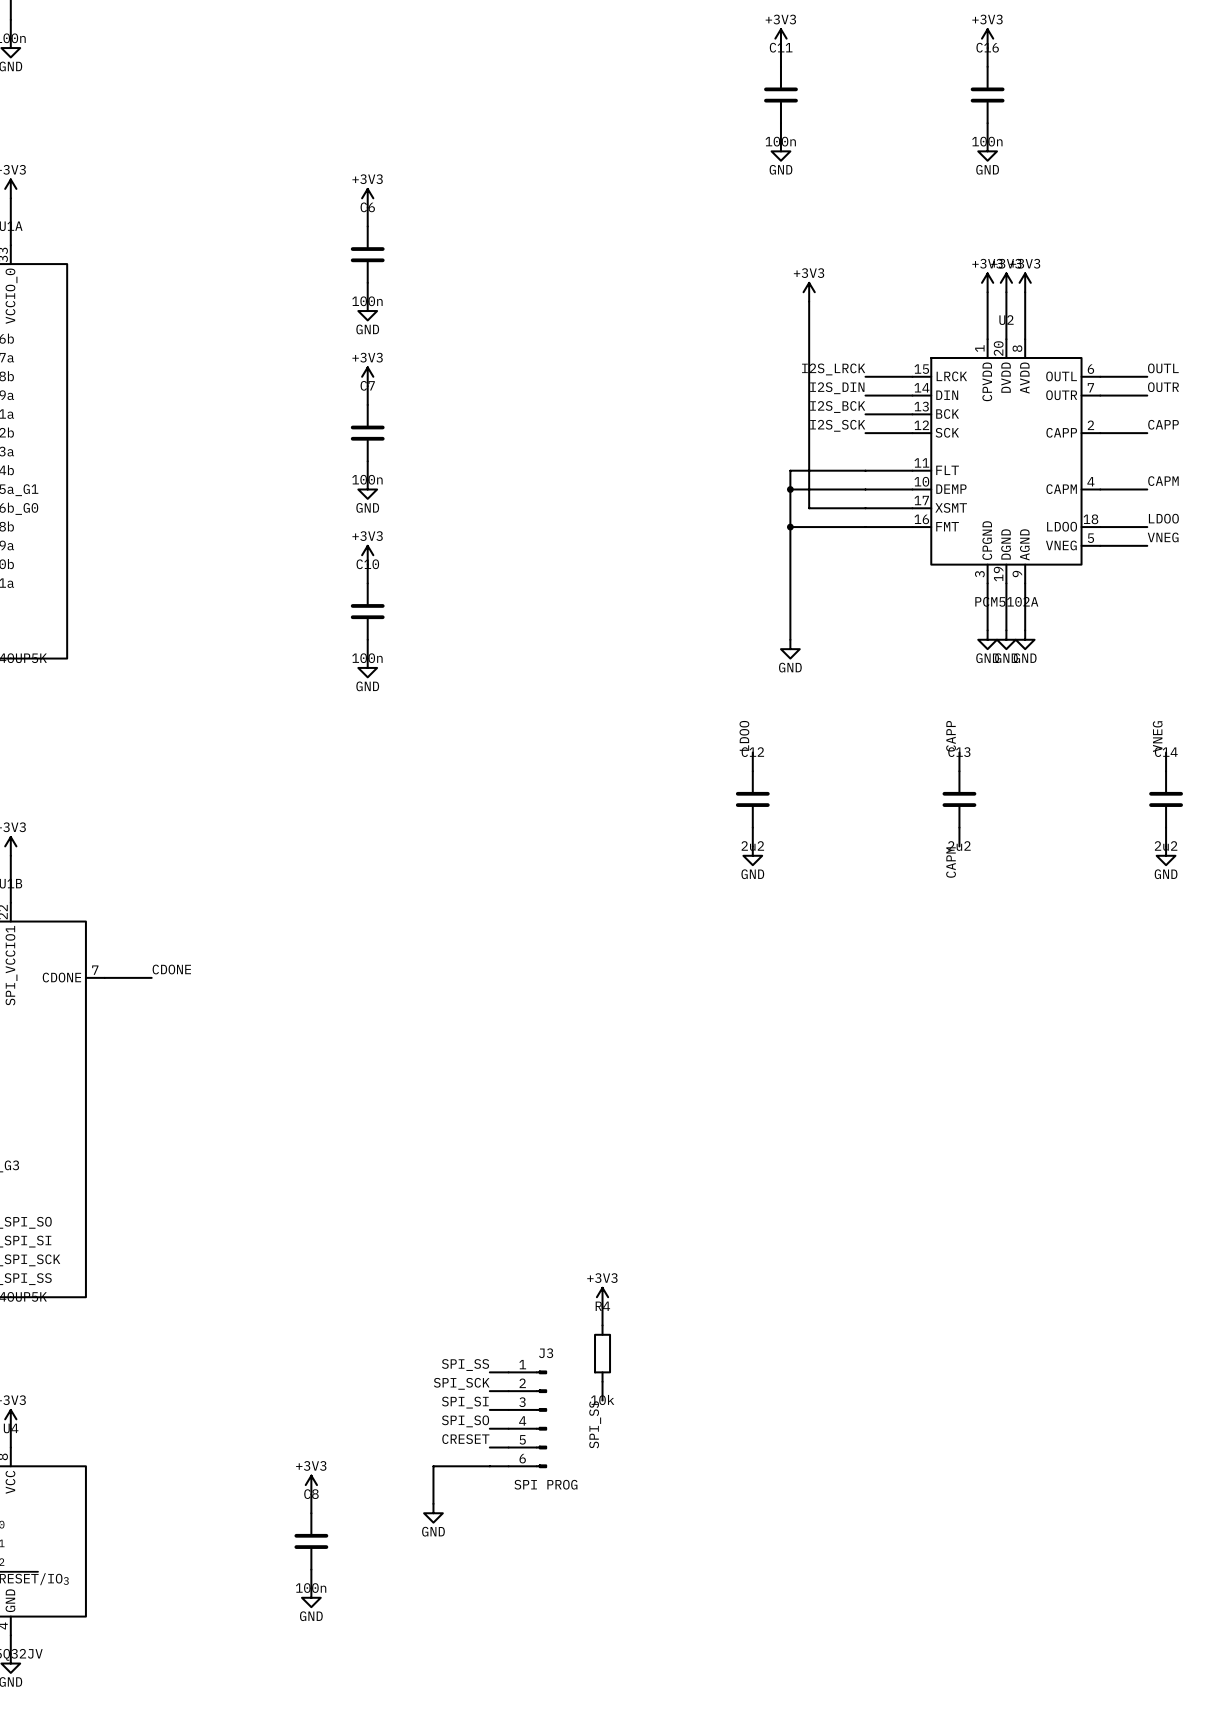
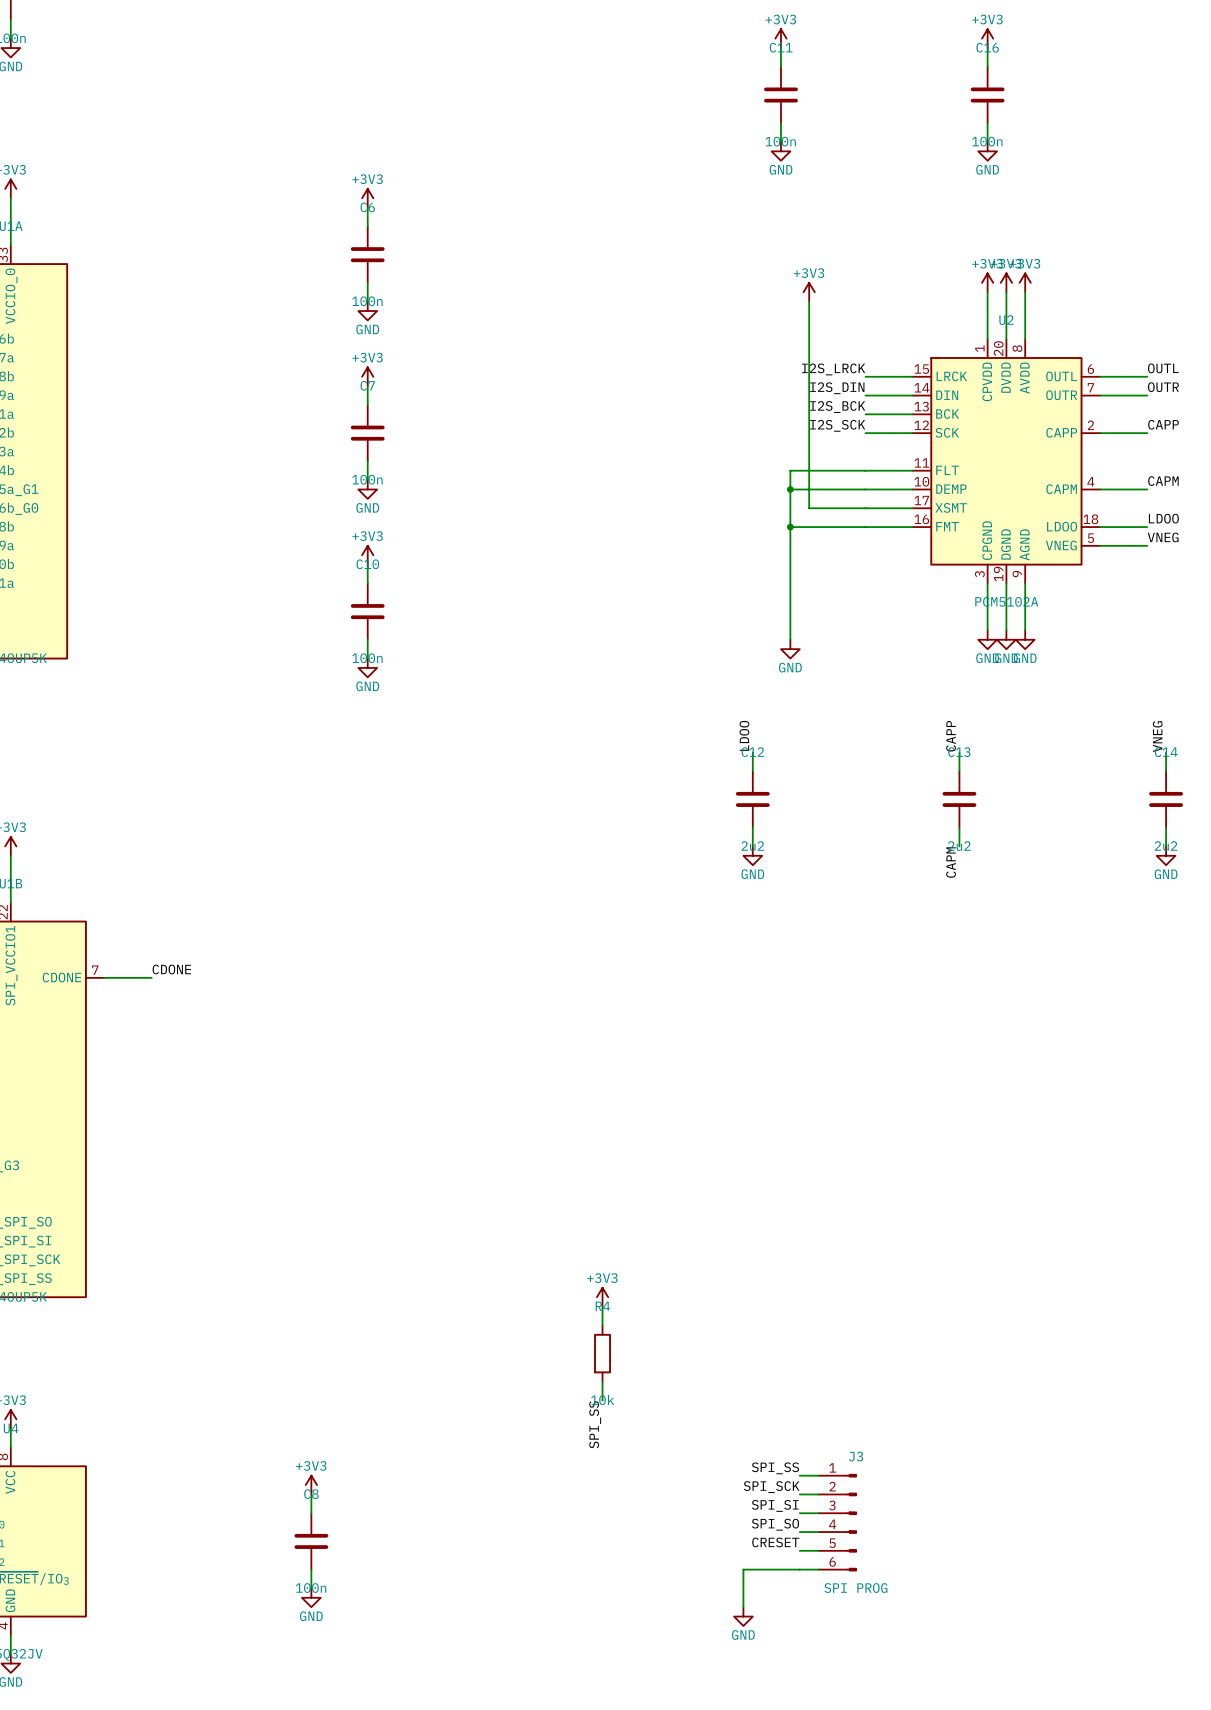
label: SPI_SS (465, 1365) -> none
wire: (489, 1372) (508, 1372) -> none
label: SPI_SCK (461, 1383) -> none
wire: (489, 1391) (508, 1391) -> none
label: SPI_SI (465, 1402) -> none
wire: (489, 1409) (508, 1409) -> none
J3 position: (527, 1419) -> (837, 1522)
label: SPI_SO (465, 1421) -> none
wire: (489, 1428) (508, 1428) -> none
label: CRESET (465, 1439) -> none
wire: (489, 1447) (508, 1447) -> none
wire: (508, 1466) (433, 1466) (433, 1503) -> none
label: none -> SPI_SS (775, 1468)
wire: none -> (799, 1475) (818, 1475)
label: none -> SPI_SCK (771, 1487)
wire: none -> (799, 1494) (818, 1494)
label: none -> SPI_SI (775, 1505)
power symbol: GND (433, 1513) -> none
wire: none -> (799, 1513) (818, 1513)
label: none -> SPI_SO (775, 1524)
wire: none -> (799, 1532) (818, 1532)
label: none -> CRESET (775, 1542)
wire: none -> (799, 1550) (818, 1550)
wire: none -> (818, 1569) (743, 1569) (743, 1607)
power symbol: none -> GND (743, 1616)

